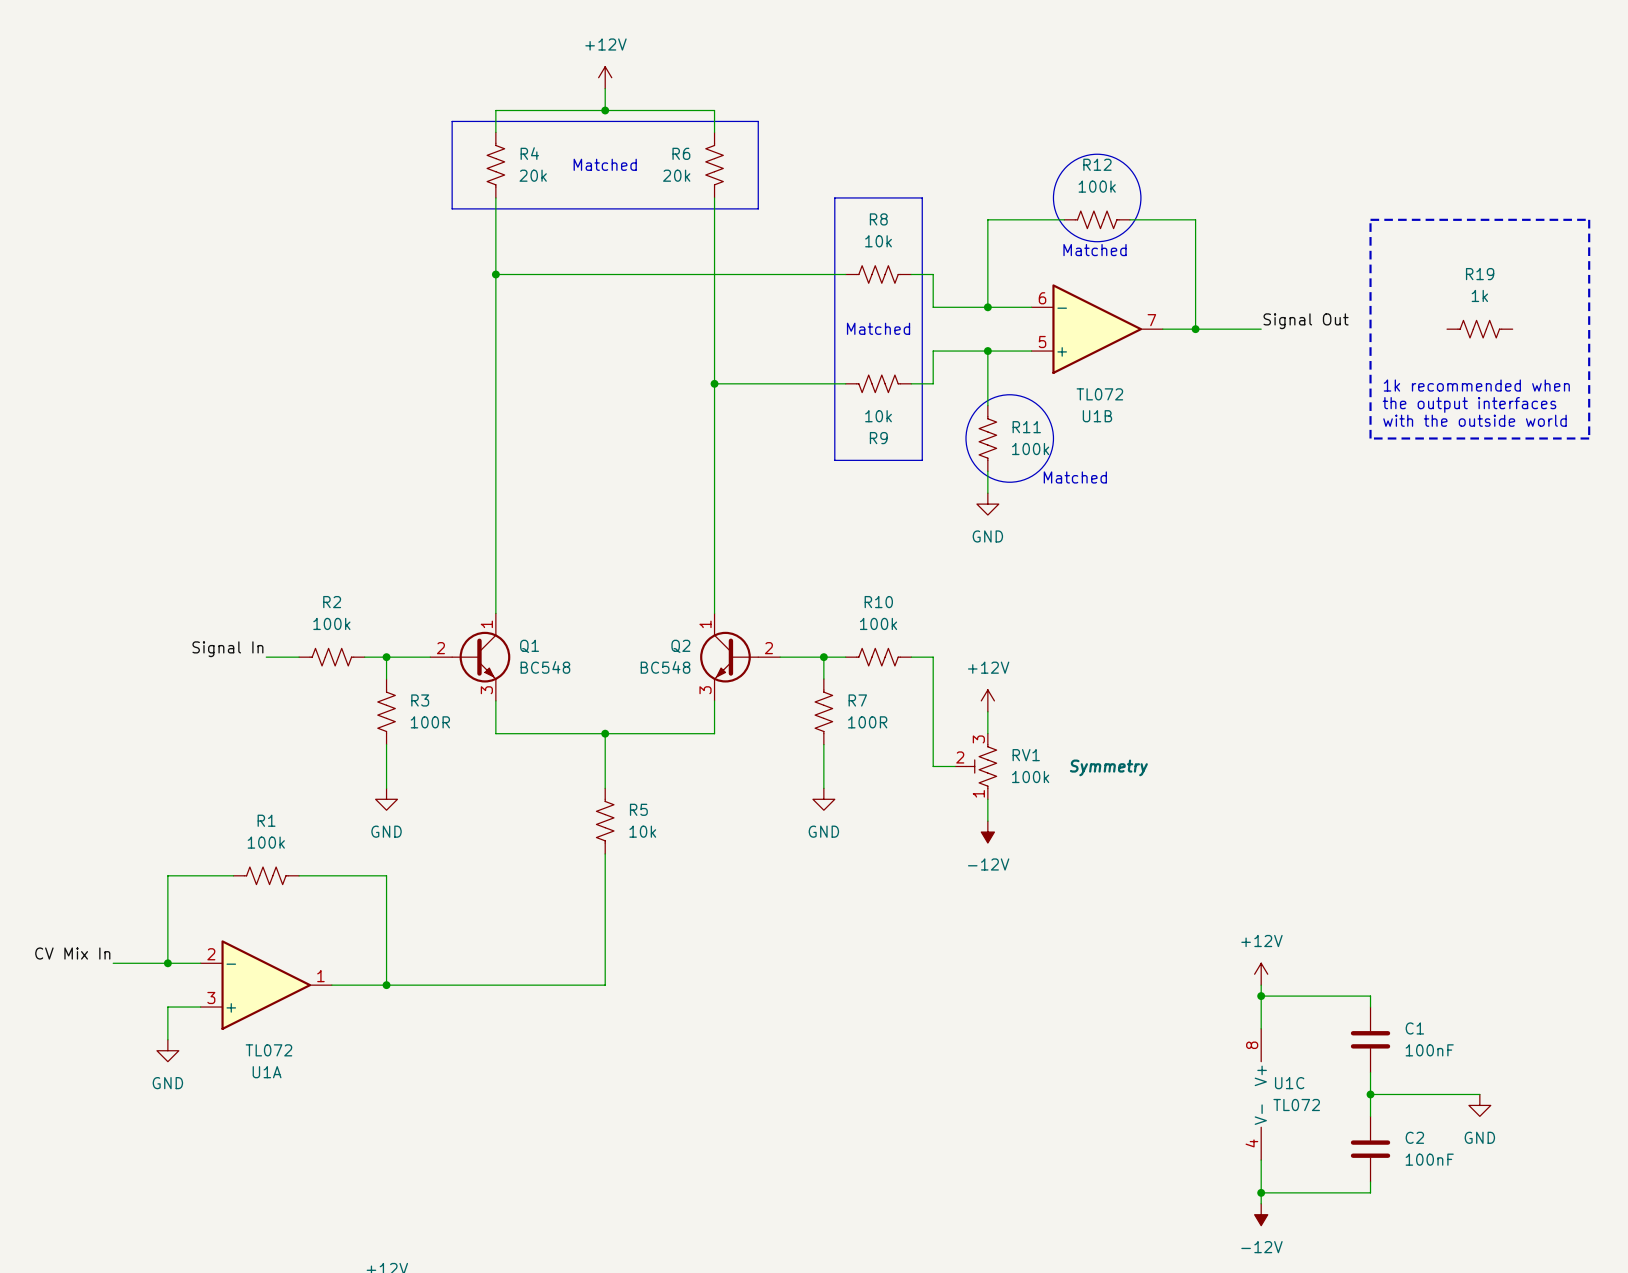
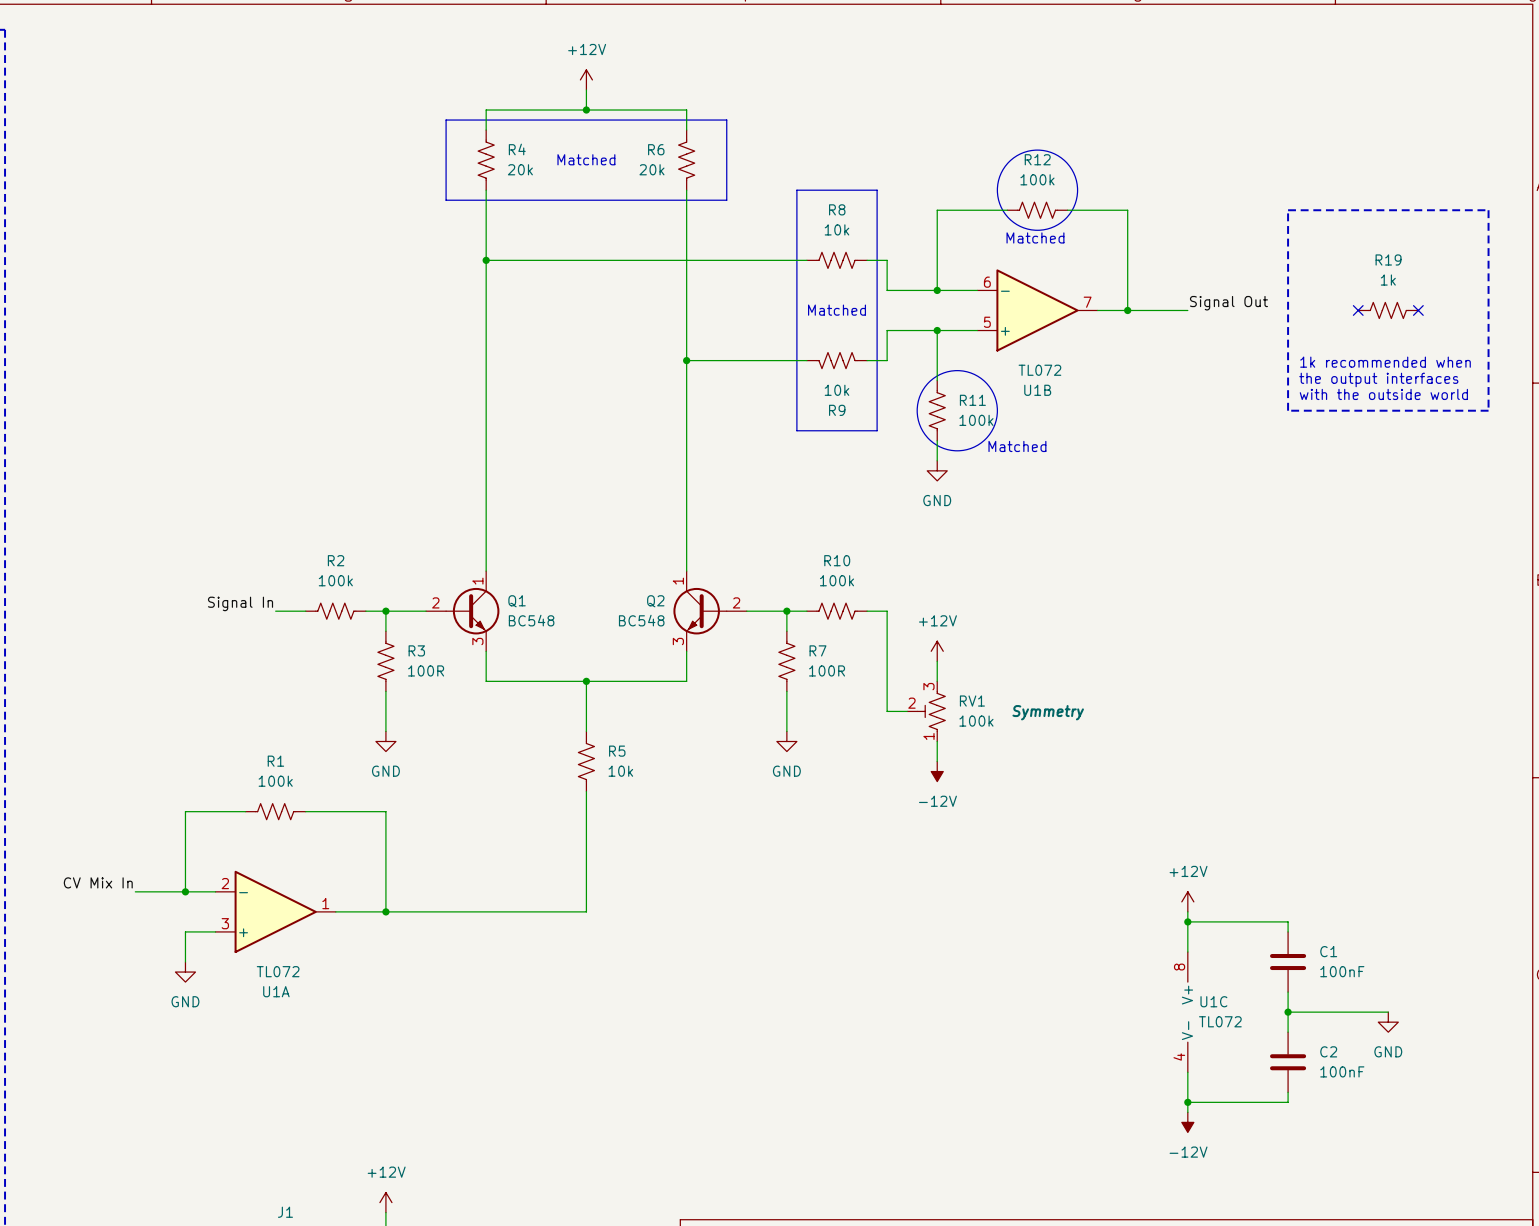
no-connect mark: none -> (1358, 310)
no-connect mark: none -> (1418, 310)

